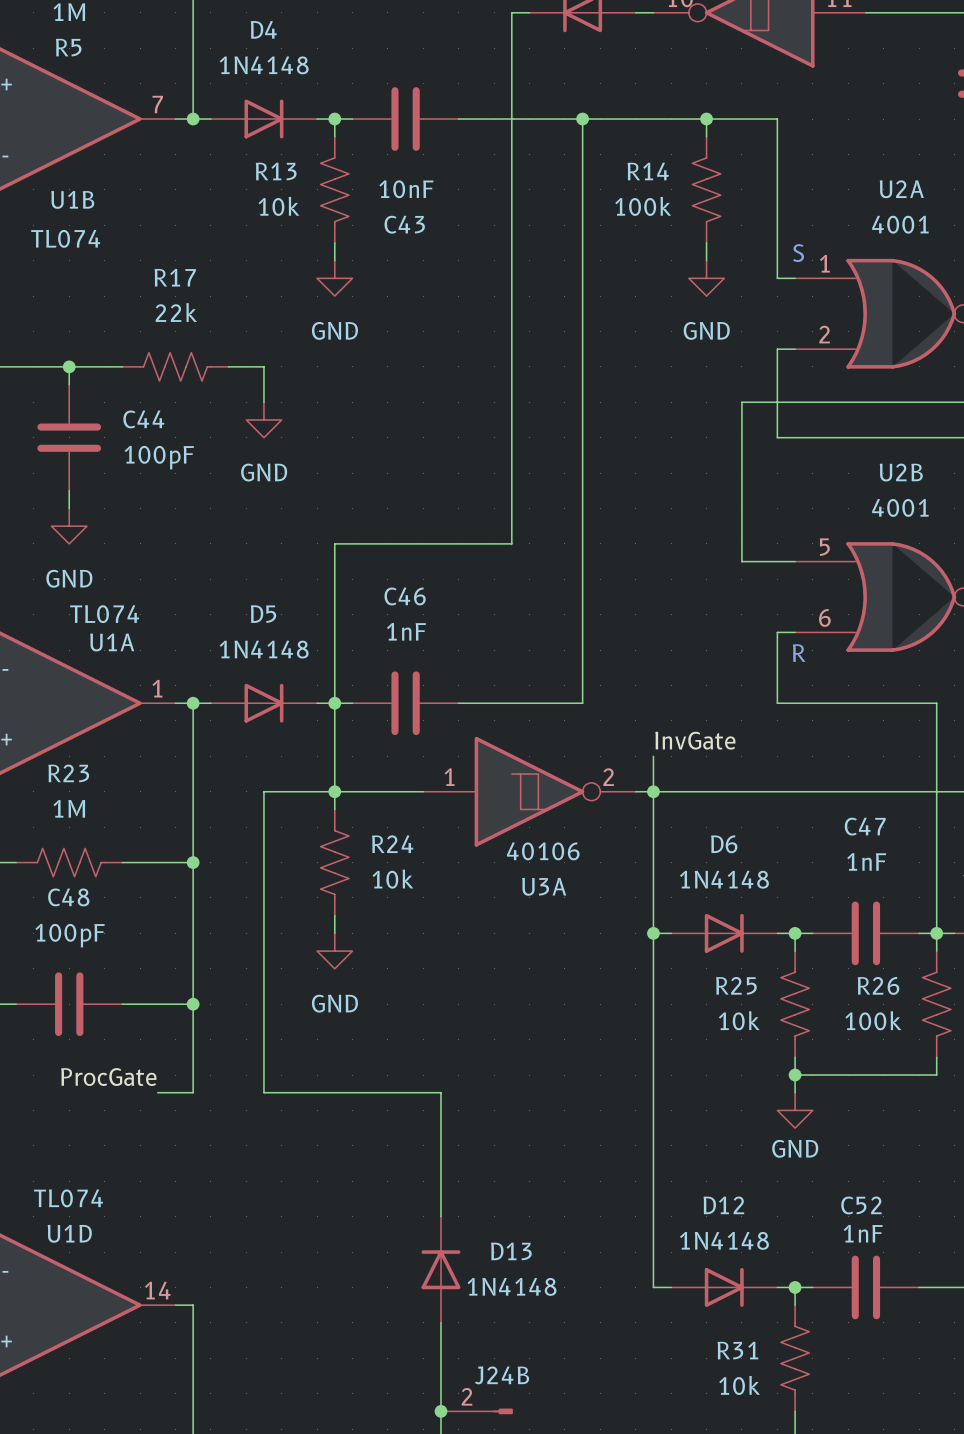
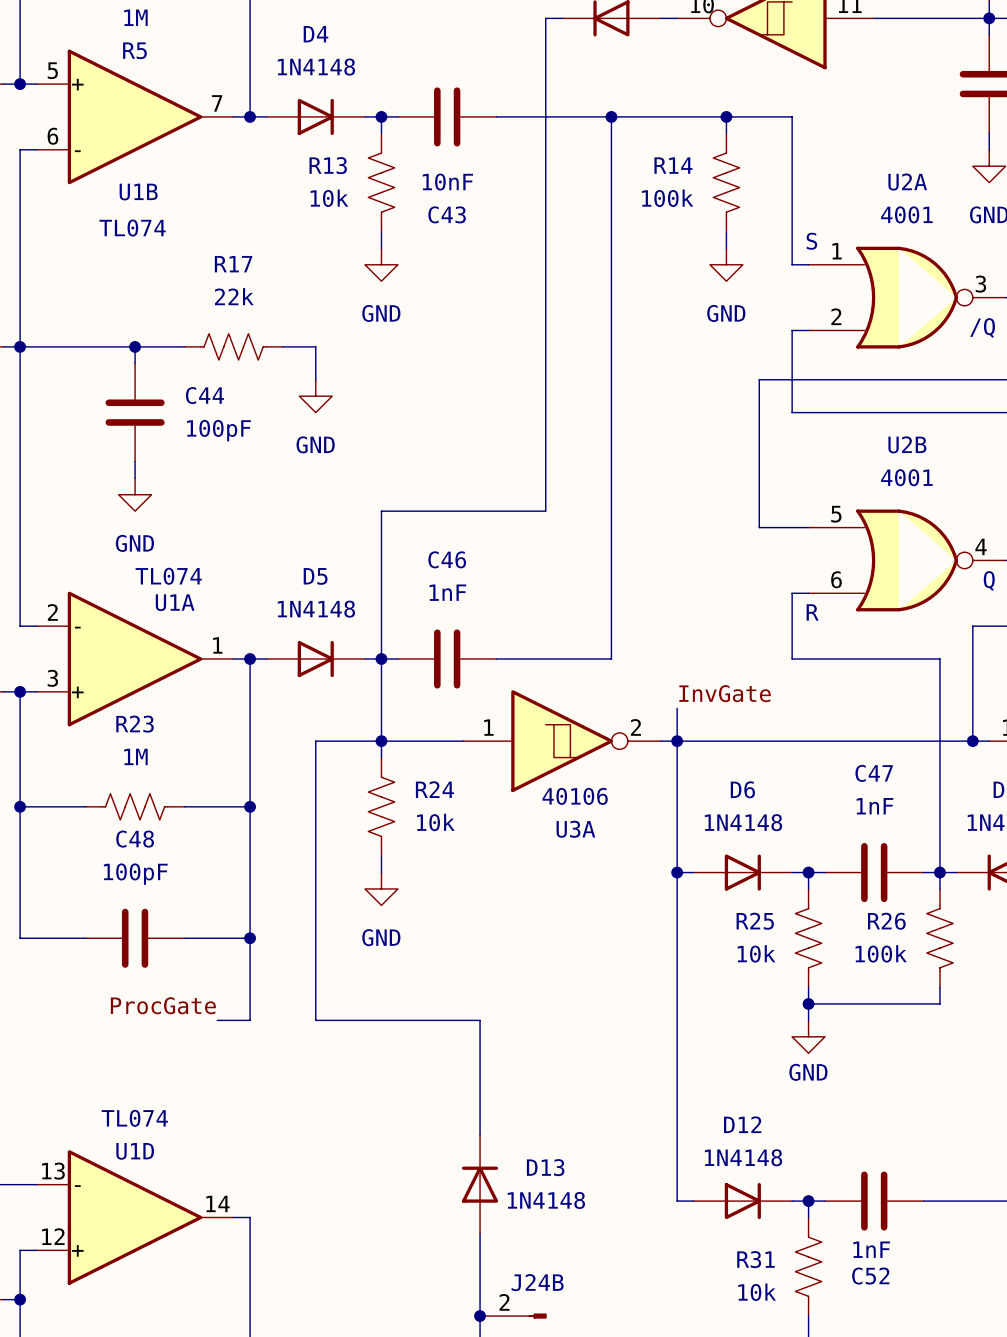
C52 name position: C52 (861, 1205) -> C52 (870, 1276)
C52 value position: 1nF (863, 1233) -> 1nF (871, 1249)

